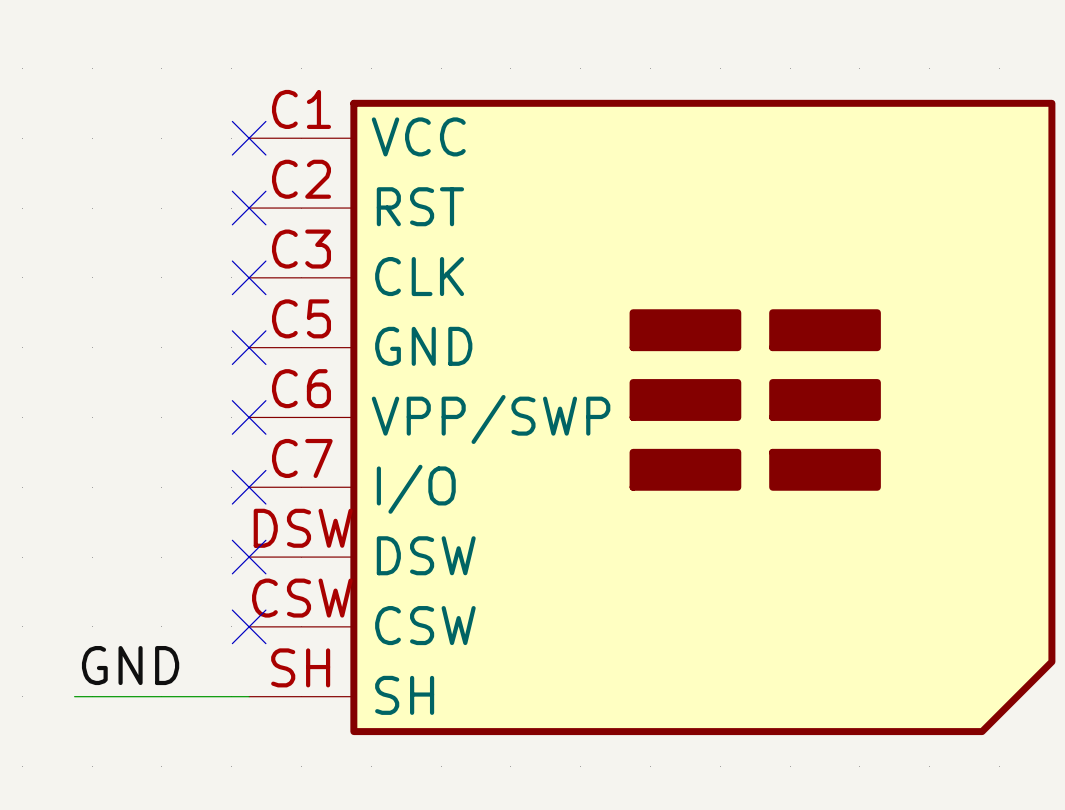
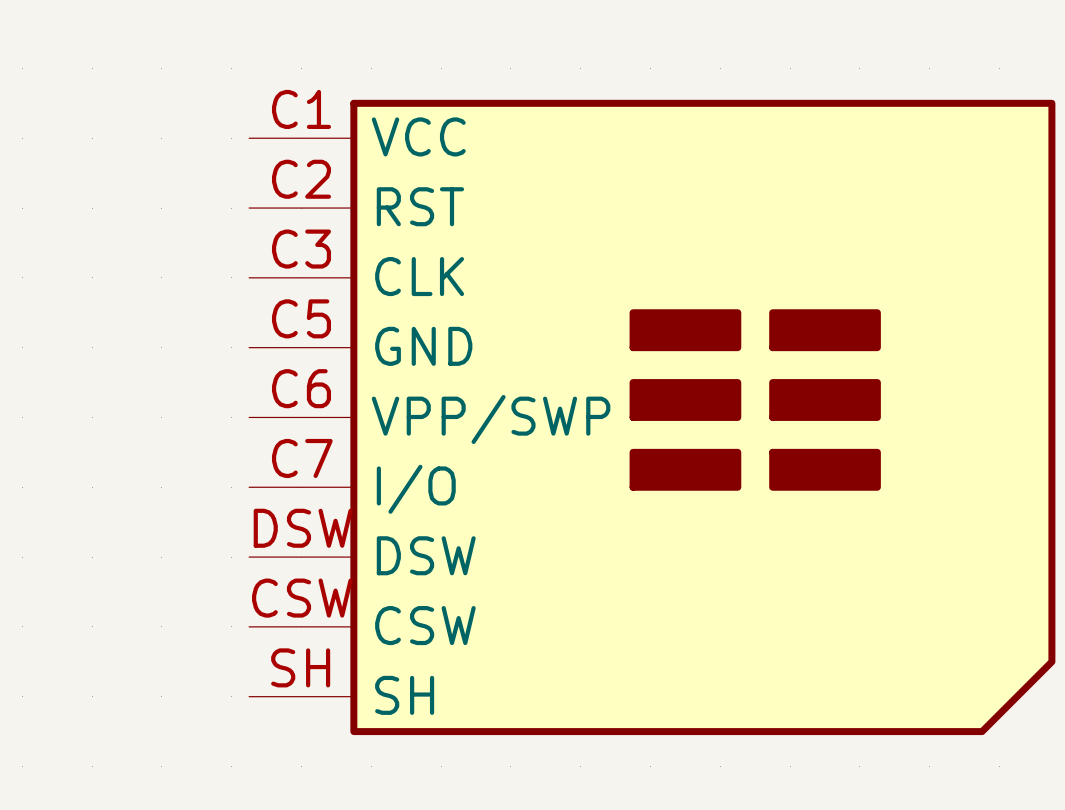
no-connect mark: (249, 138) -> none
no-connect mark: (249, 208) -> none
no-connect mark: (249, 277) -> none
no-connect mark: (249, 347) -> none
no-connect mark: (249, 417) -> none
no-connect mark: (249, 487) -> none
no-connect mark: (249, 557) -> none
no-connect mark: (249, 626) -> none
label: GND (130, 665) -> none
wire: (74, 696) (249, 696) -> none

